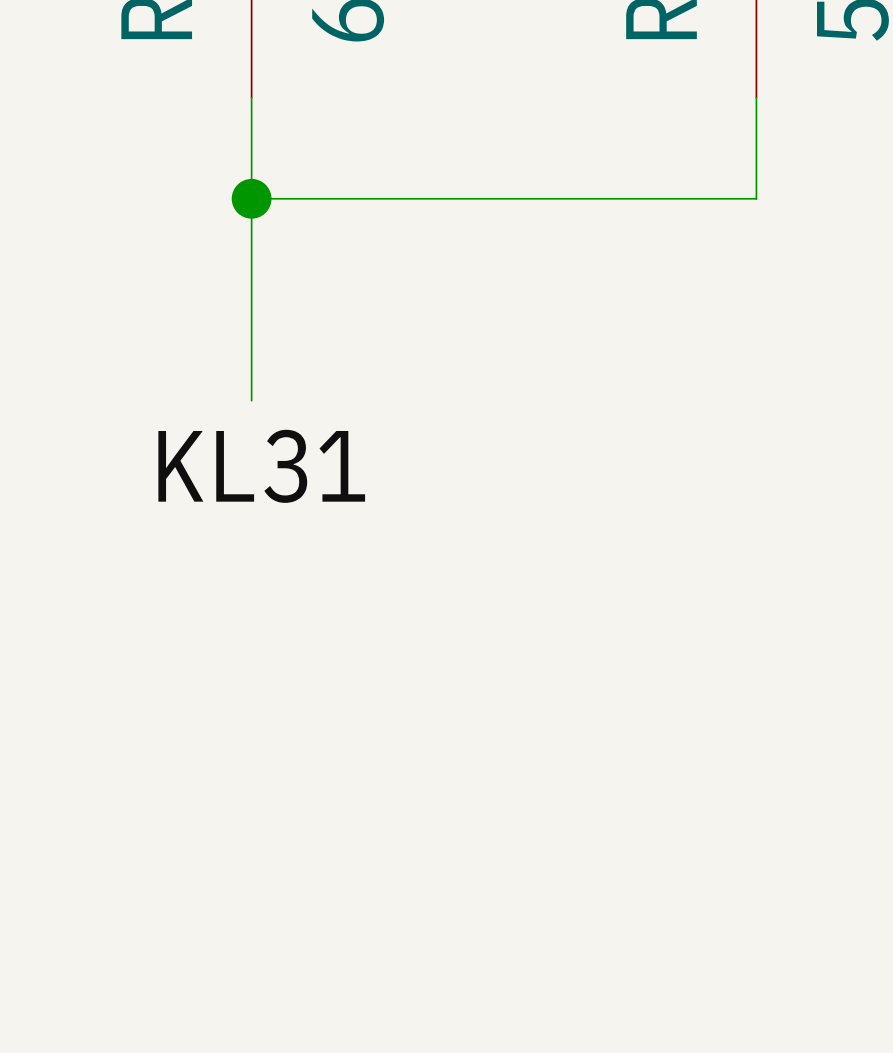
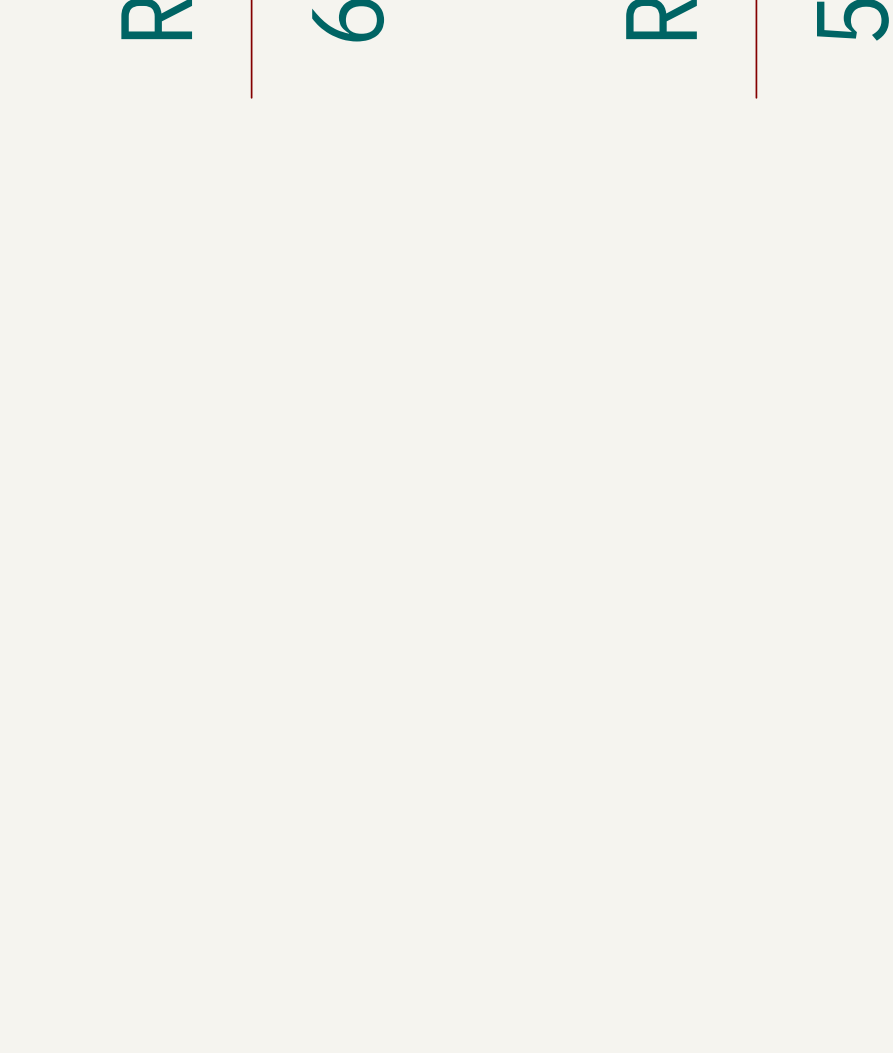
wire: (251, 97) (251, 400) -> none
wire: (756, 97) (756, 198) (251, 198) -> none
junction: (251, 198) -> none
label: KL31 (261, 466) -> none

